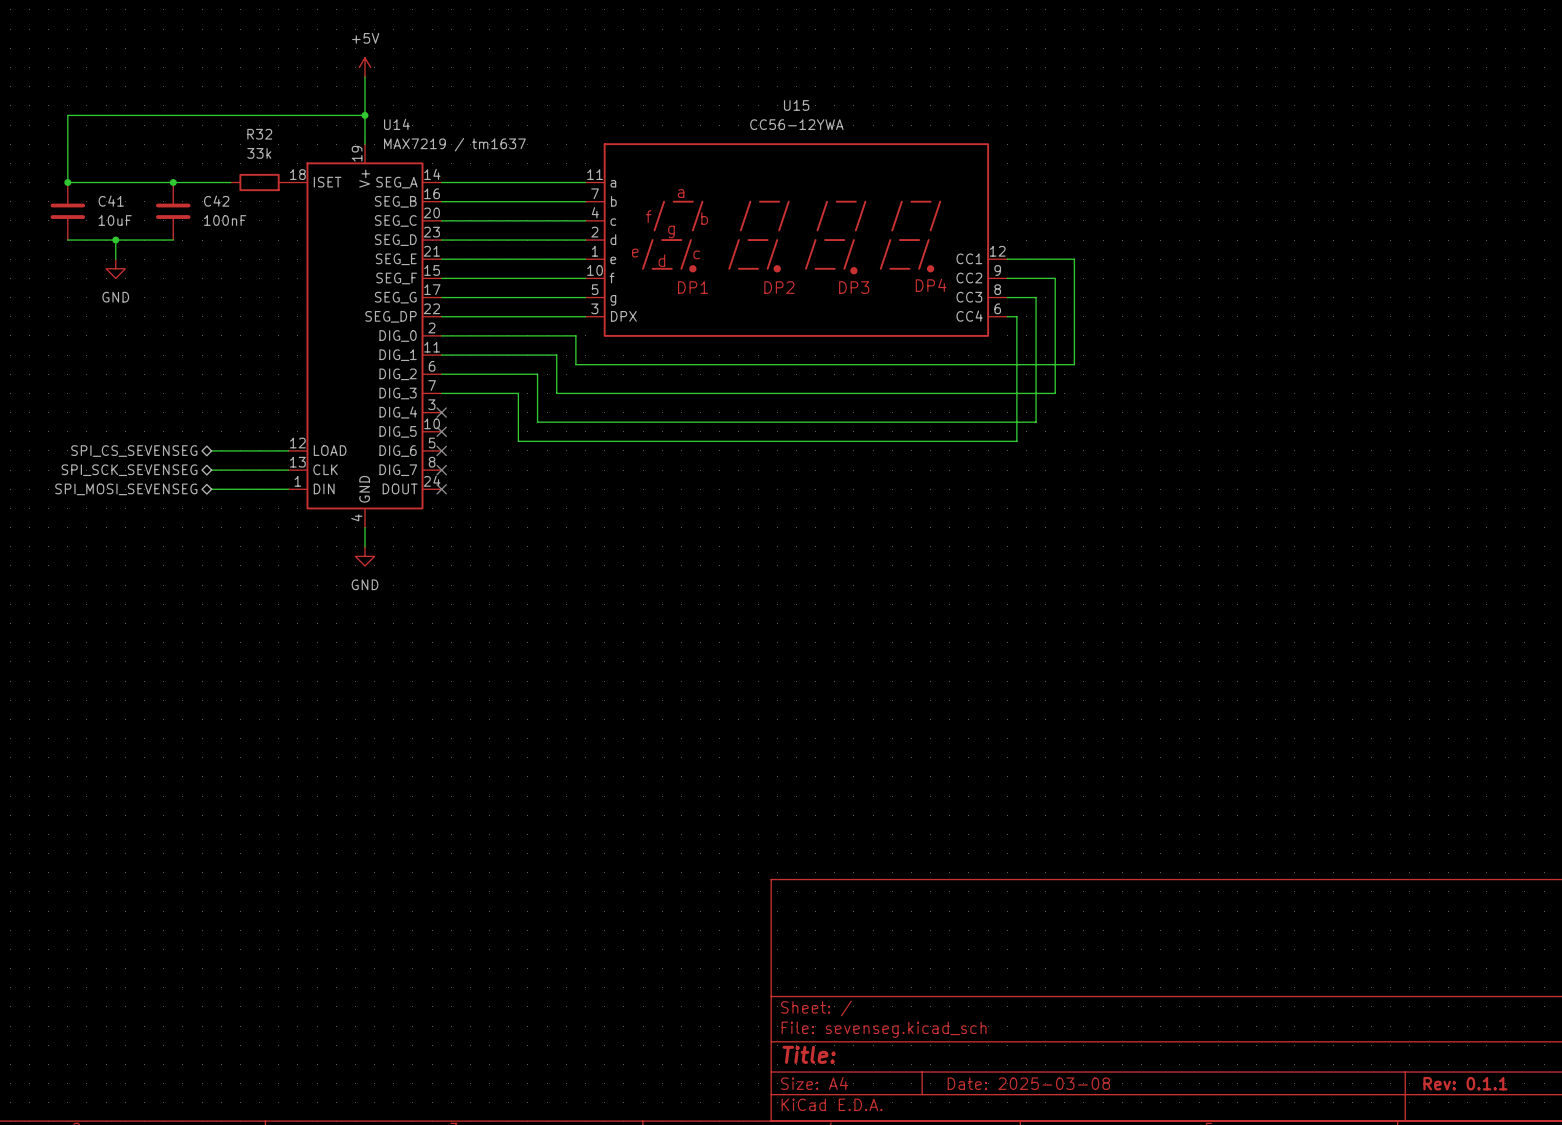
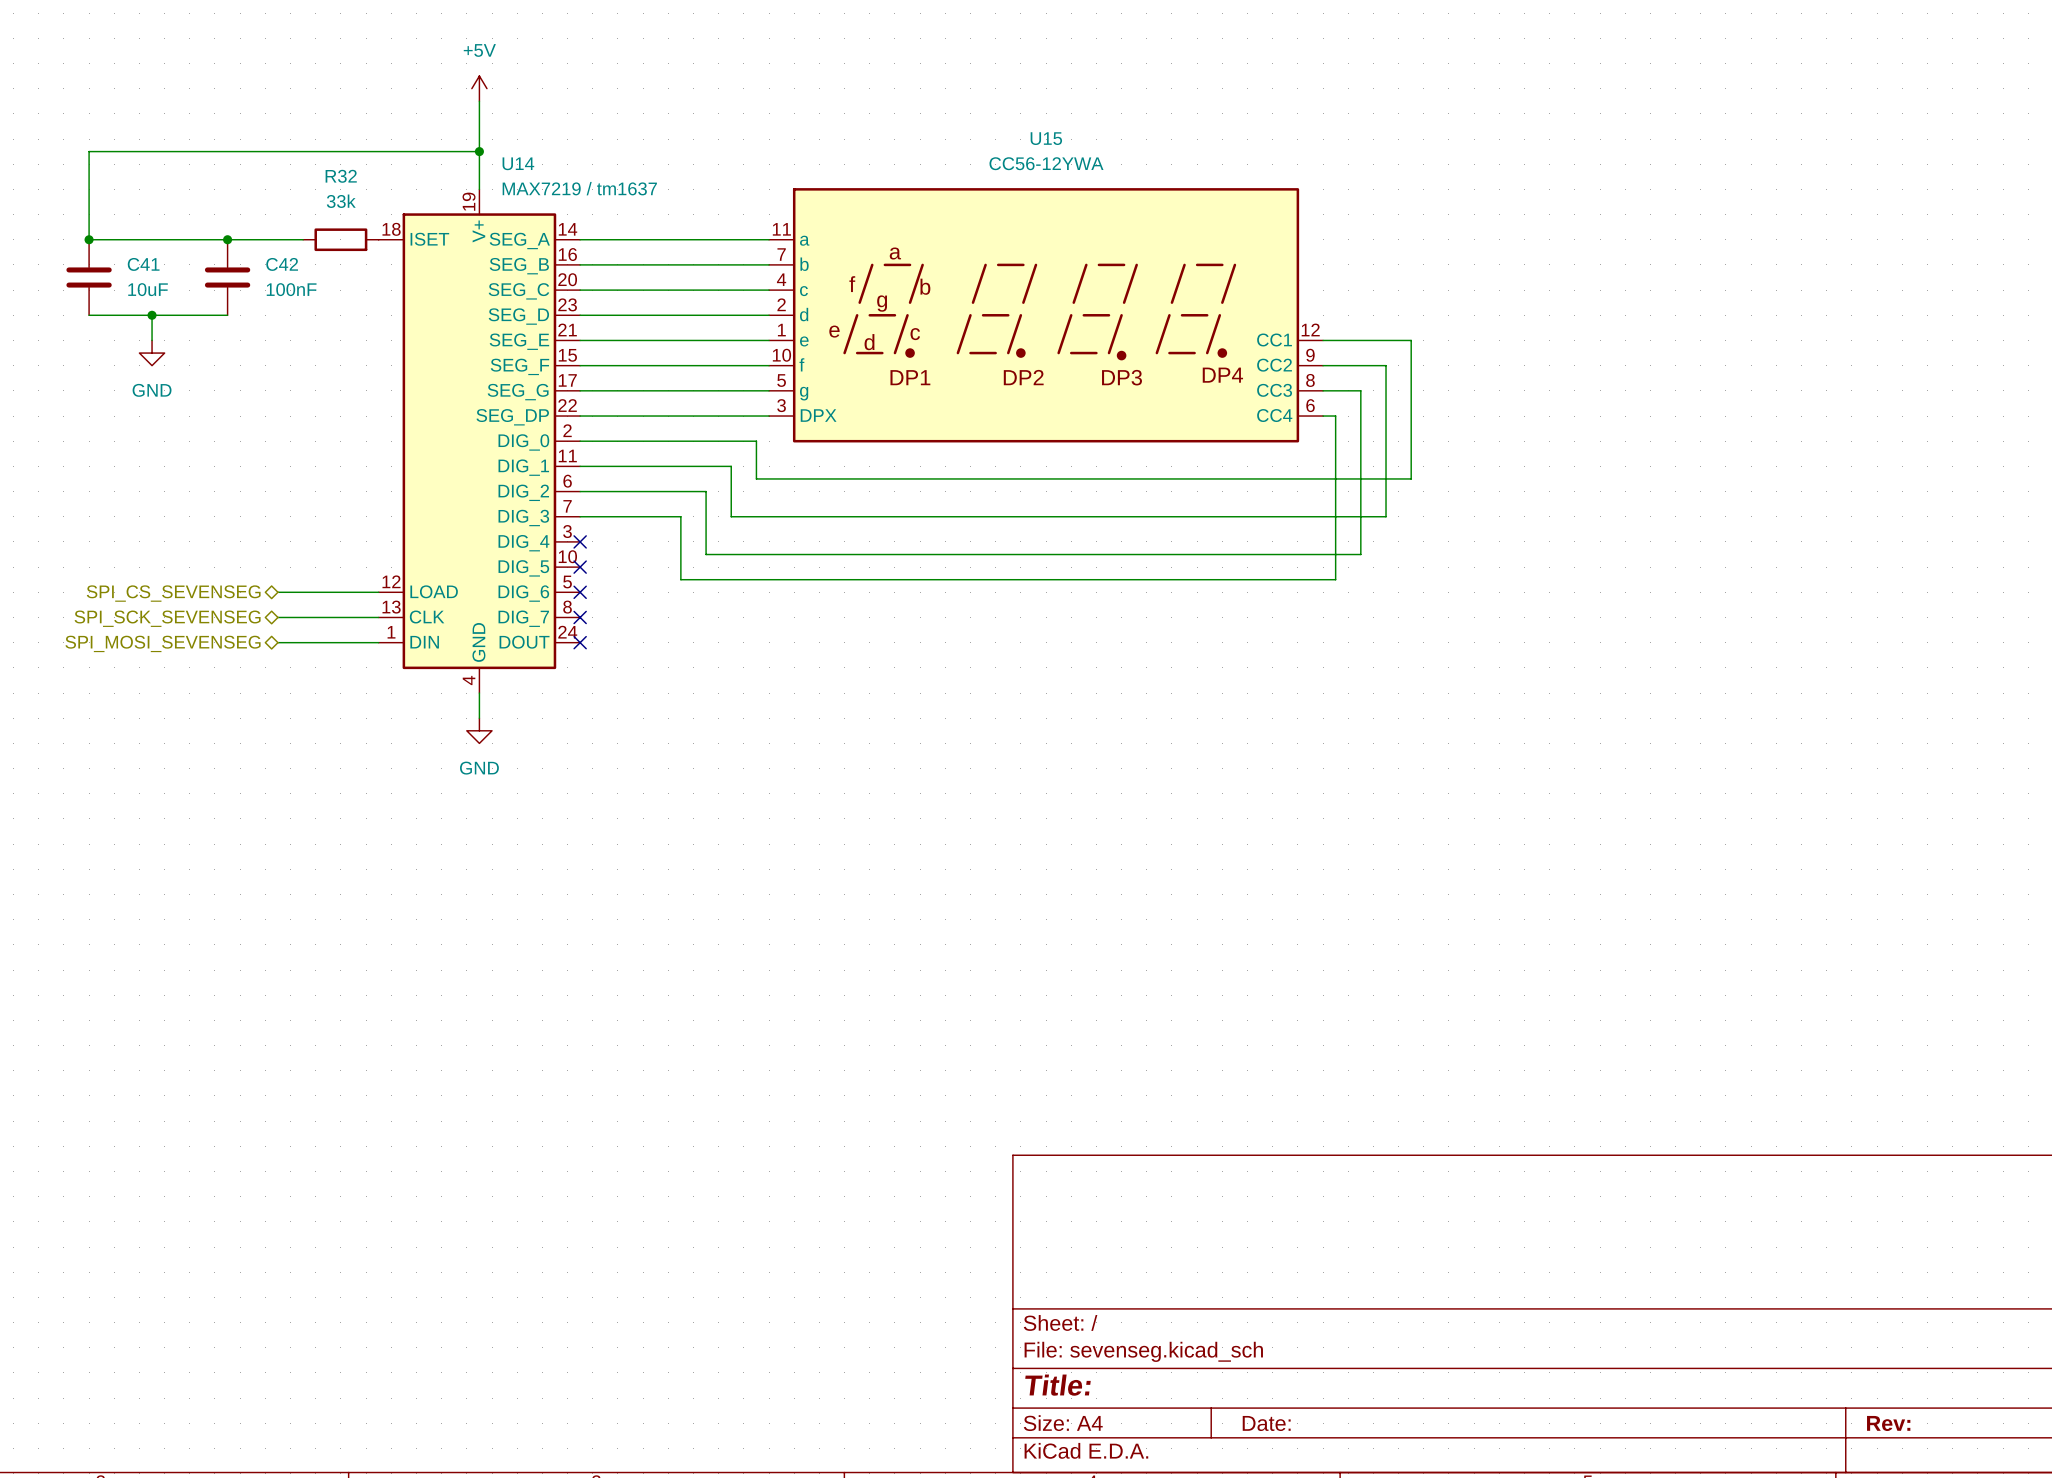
title block: Date: 2025-03-08 (1028, 1083) -> Date: (1266, 1423)
title block: Rev: 0.1.1 (1465, 1083) -> Rev: (1888, 1423)

